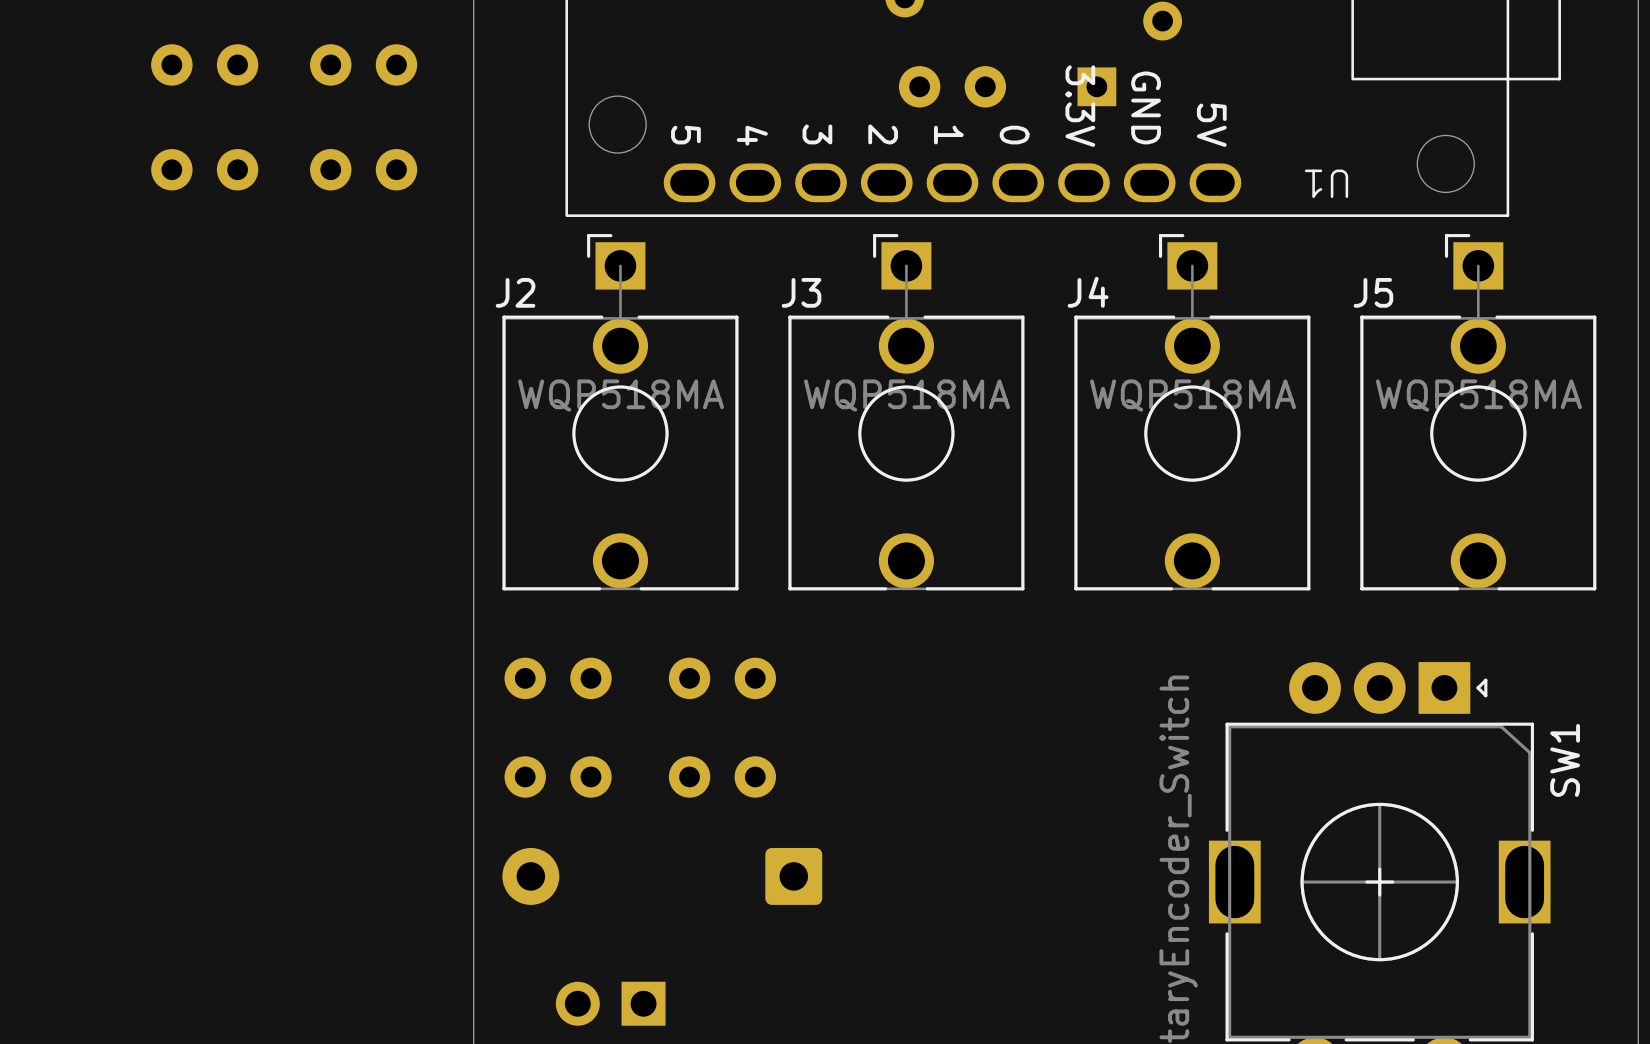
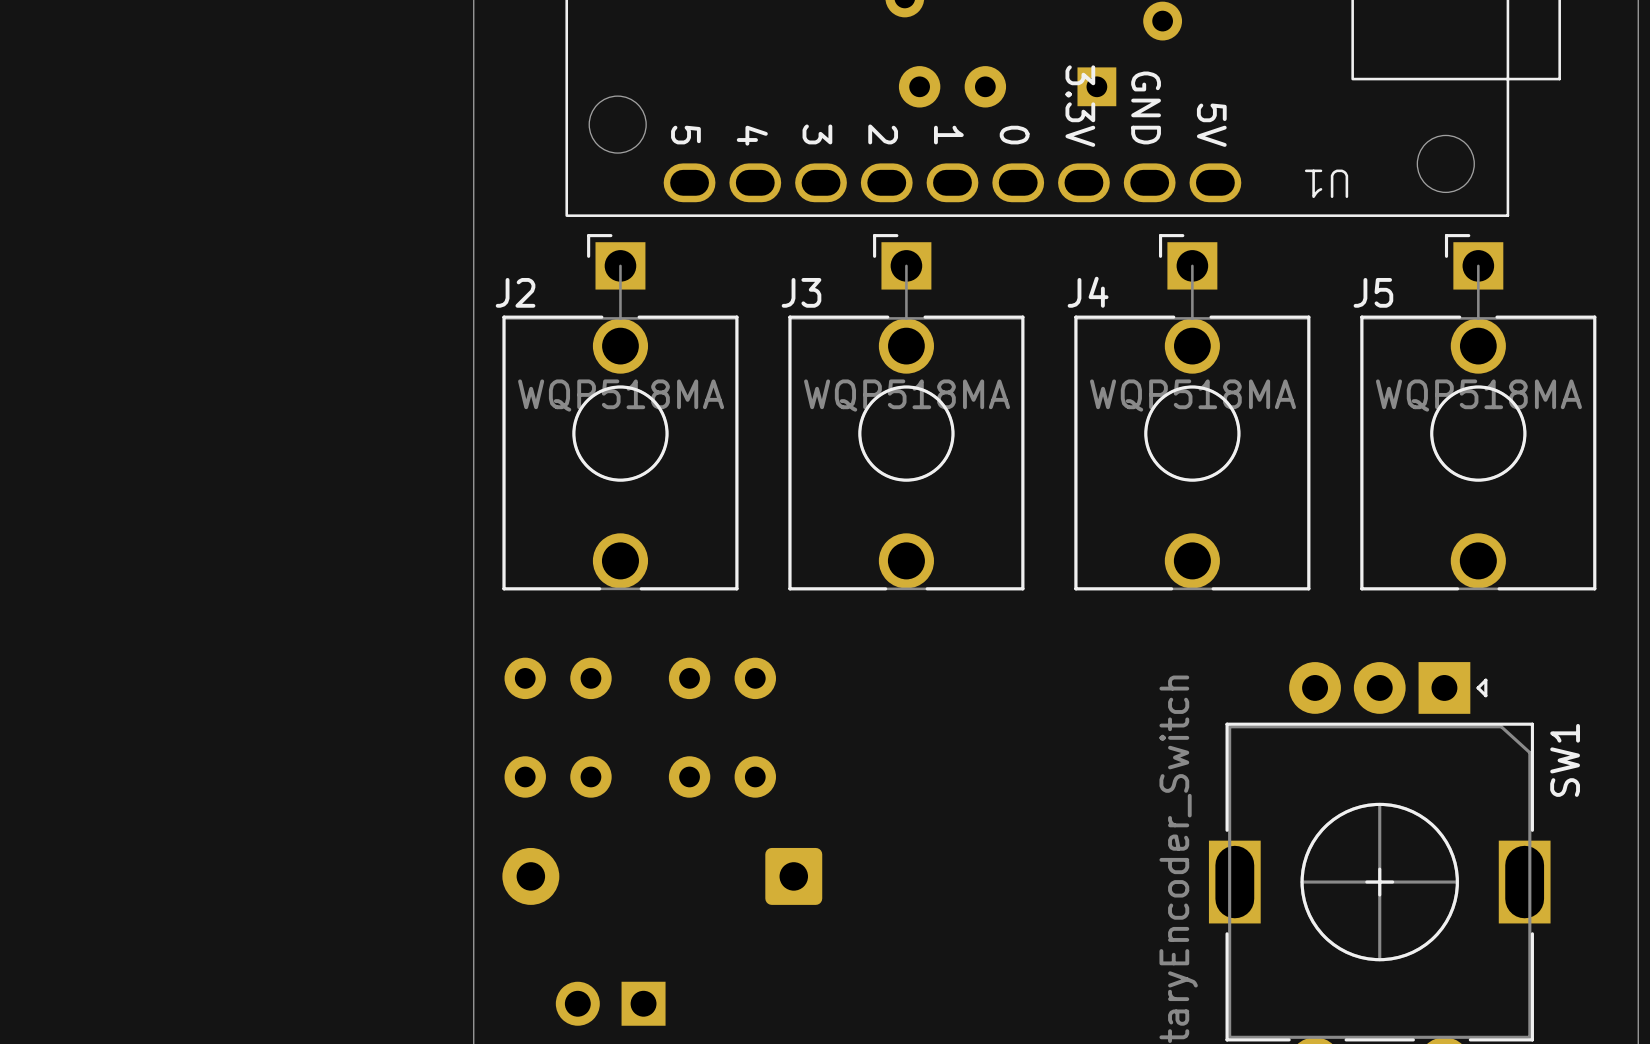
part: (204, 64) -> none
part: (363, 64) -> none
part: (204, 169) -> none
part: (363, 169) -> none

